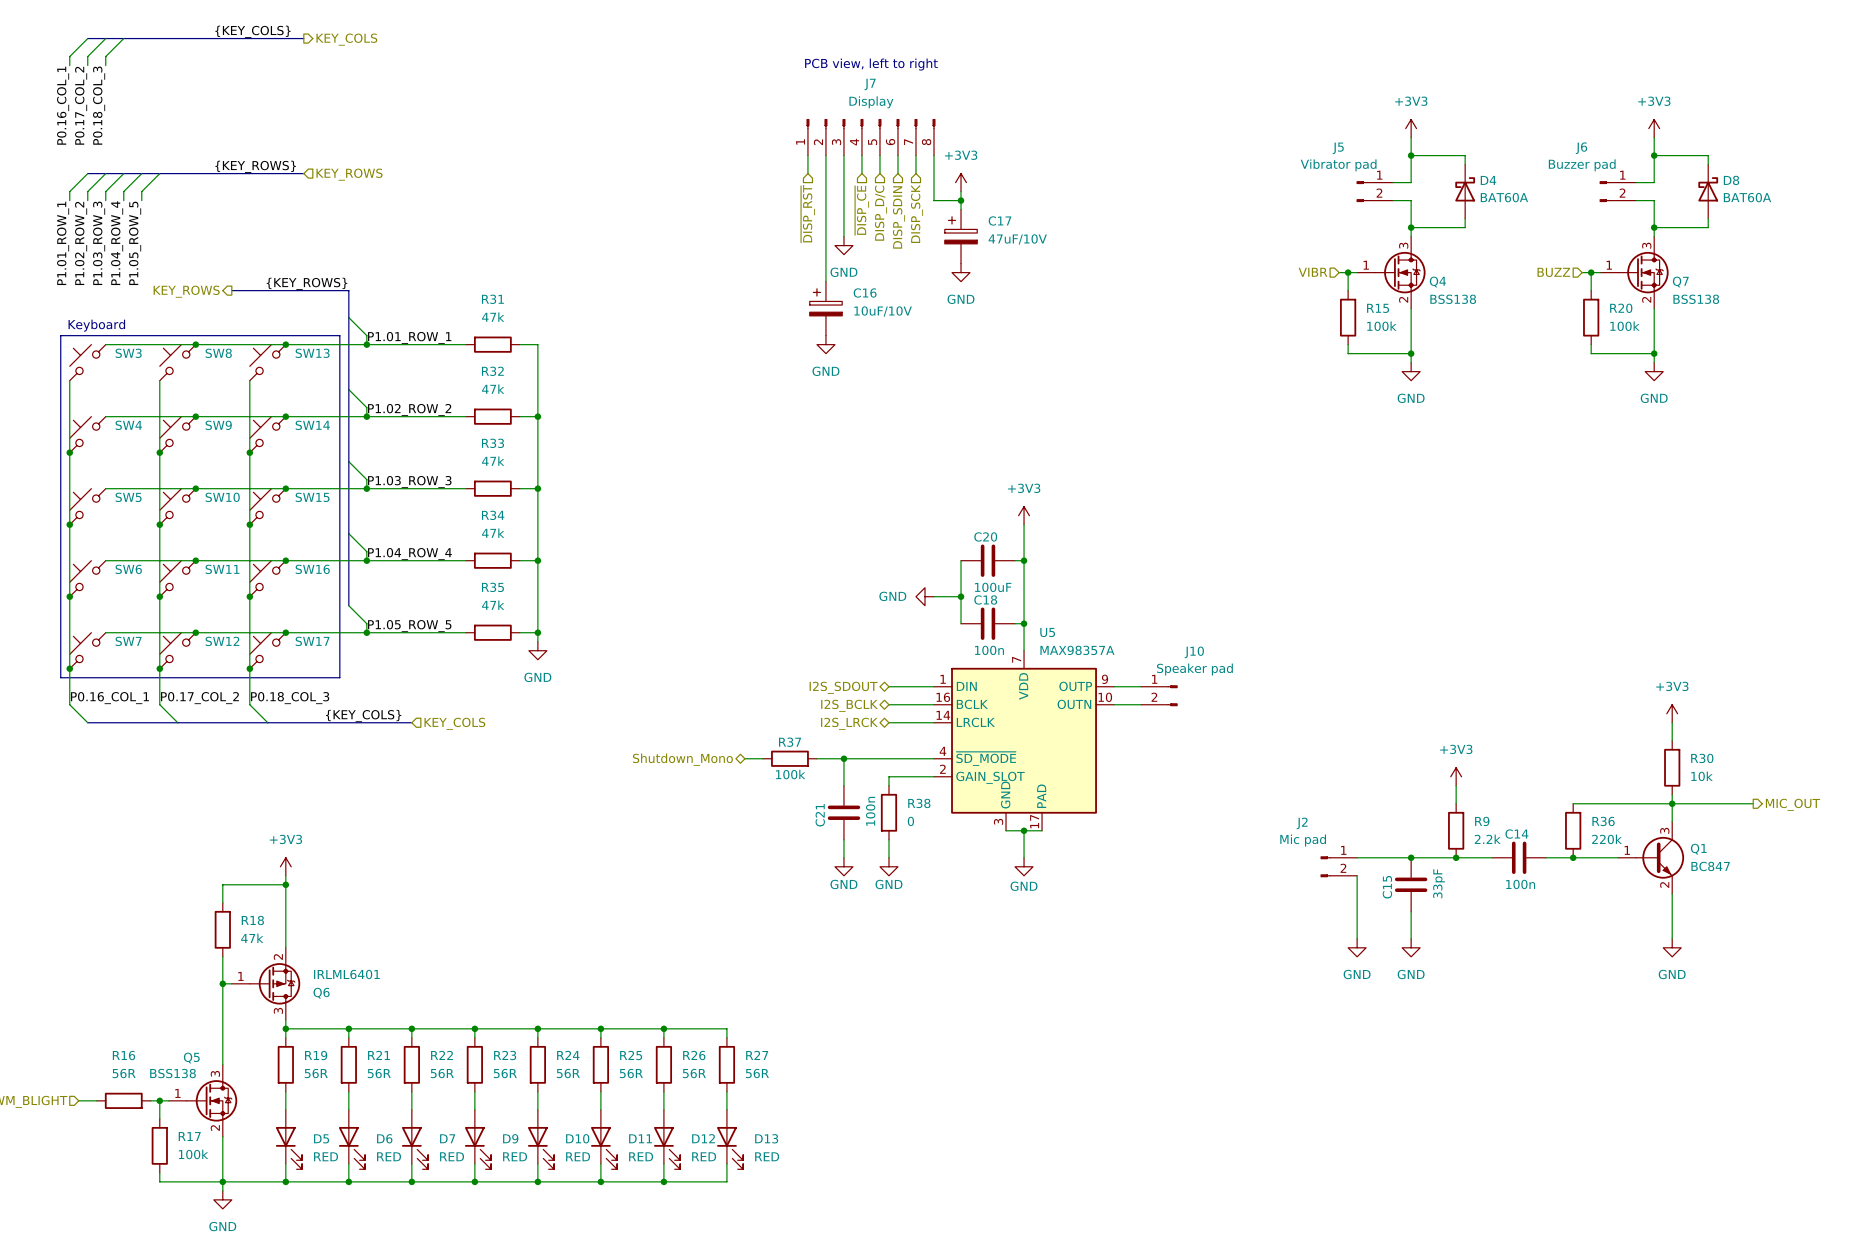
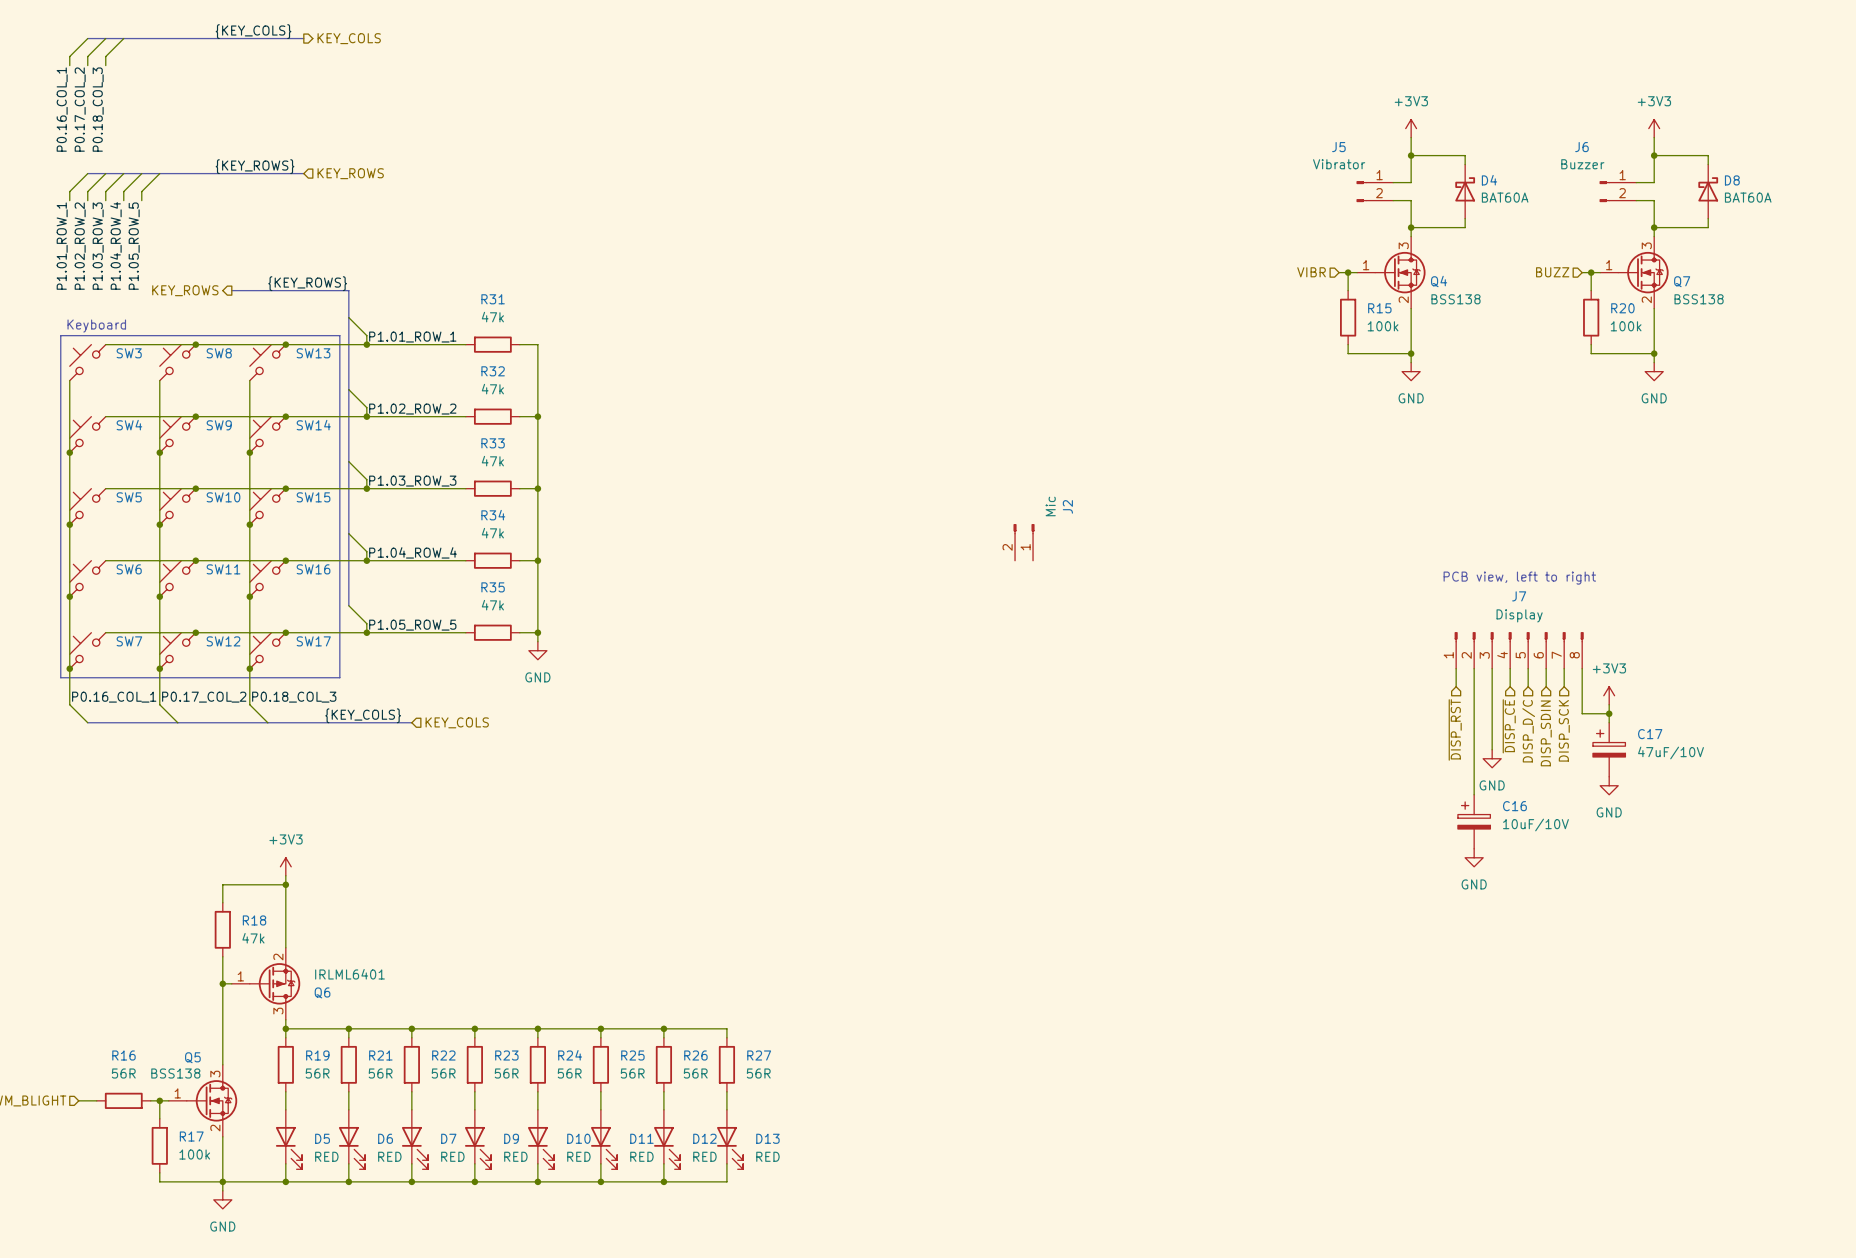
text: PCB view, left to right (871, 64) -> none
J7 position: (870, 137) -> (1519, 650)
wire: (807, 155) (807, 173) -> none
wire: (825, 155) (825, 281) -> none
wire: (843, 155) (843, 236) -> none
wire: (861, 155) (861, 173) -> none
wire: (879, 155) (879, 173) -> none
wire: (897, 155) (897, 173) -> none
wire: (915, 155) (915, 173) -> none
wire: (934, 155) (934, 200) (961, 200) -> none
J5 value: Vibrator pad (1338, 165) -> Vibrator (1339, 164)
J6 value: Buzzer pad (1582, 165) -> Buzzer (1582, 164)
power symbol: +3V3 (961, 182) -> none
wire: (961, 191) (961, 209) -> none
junction: (961, 200) -> none
hierarchical label: ~{DISP_CE} (862, 210) -> none
hierarchical label: ~{DISP_RST} (808, 213) -> none
hierarchical label: DISP_D/C (881, 213) -> none
hierarchical label: DISP_SCK (917, 213) -> none
hierarchical label: DISP_SDIN (899, 217) -> none
C17 position: (961, 236) -> (1609, 749)
power symbol: GND (843, 245) -> none
power symbol: GND (961, 272) -> none
C16 position: (825, 308) -> (1474, 821)
power symbol: GND (825, 344) -> none
power symbol: +3V3 (1024, 515) -> none
wire: (1024, 524) (1024, 650) -> none
wire: (961, 560) (961, 623) -> none
C20: 100uF (988, 560) -> none
wire: (1015, 560) (1024, 560) -> none
junction: (1024, 560) -> none
text: none -> PCB view, left to right (1519, 578)
power symbol: GND (925, 596) -> none
wire: (934, 596) (961, 596) -> none
junction: (961, 596) -> none
C18: 100n (988, 623) -> none
wire: (1015, 623) (1024, 623) -> none
junction: (1024, 623) -> none
wire: none -> (1474, 668) (1474, 794)
wire: none -> (1492, 668) (1492, 749)
wire: none -> (1510, 668) (1510, 686)
wire: none -> (1528, 668) (1528, 686)
wire: none -> (1546, 668) (1546, 686)
wire: none -> (1564, 668) (1564, 686)
wire: none -> (1582, 668) (1582, 713) (1609, 713)
wire: (888, 686) (934, 686) -> none
wire: (1114, 686) (1141, 686) -> none
hierarchical label: I2S_SDOUT (843, 687) -> none
J10: Speaker pad (1159, 695) -> none
wire: (888, 704) (934, 704) -> none
wire: (1114, 704) (1141, 704) -> none
hierarchical label: I2S_BCLK (849, 705) -> none
junction: none -> (1609, 713)
power symbol position: +3V3 (1672, 713) -> +3V3 (1609, 695)
wire: (888, 722) (934, 722) -> none
wire: (1672, 722) (1672, 740) -> (1609, 704) (1609, 722)
hierarchical label: I2S_LRCK (849, 723) -> none
hierarchical label: none -> ~{DISP_CE} (1509, 726)
hierarchical label: none -> ~{DISP_RST} (1455, 729)
hierarchical label: none -> DISP_D/C (1528, 731)
hierarchical label: none -> DISP_SCK (1564, 730)
hierarchical label: none -> DISP_SDIN (1546, 733)
U5: MAX98357A (1024, 740) -> none
wire: (744, 758) (762, 758) -> none
R37: 100k (789, 758) -> none
wire: (816, 758) (934, 758) -> none
wire: (843, 758) (843, 785) -> none
junction: (843, 758) -> none
power symbol: none -> GND (1492, 758)
hierarchical label: Shutdown_Mono (682, 759) -> none
R30: 10k (1672, 767) -> none
wire: (934, 776) (888, 776) (888, 785) -> none
power symbol: +3V3 (1456, 776) -> none
wire: (1456, 785) (1456, 803) -> (1456, 668) (1456, 686)
power symbol: none -> GND (1609, 785)
wire: (1672, 794) (1672, 821) -> none
wire: (1573, 803) (1753, 803) -> none
junction: (1672, 803) -> none
hierarchical label: MIC_OUT (1792, 804) -> none
C21: 100n (843, 812) -> none
R38: 0 (888, 812) -> none
wire: (1006, 830) (1042, 830) -> none
wire: (1024, 830) (1024, 857) -> none
junction: (1024, 830) -> none
R9: 2.2k (1456, 830) -> none
R36: 220k (1573, 830) -> none
wire: (843, 839) (843, 857) -> none
wire: (888, 839) (888, 857) -> none
J2 value: Mic pad (1303, 840) -> Mic (1050, 506)
wire: (1357, 857) (1492, 857) -> none
junction: (1411, 857) -> none
junction: (1456, 857) -> none
power symbol: none -> GND (1474, 857)
C14: 100n (1519, 857) -> none
wire: (1546, 857) (1618, 857) -> none
junction: (1573, 857) -> none
Q1: BC847 (1651, 857) -> none
power symbol: GND (843, 866) -> none
power symbol: GND (888, 866) -> none
power symbol: GND (1024, 866) -> none
J2 rotation: 0° (1325, 866) -> 90° clockwise (1024, 529)
J2 position: (1338, 866) -> (1024, 542)
wire: (1357, 875) (1357, 938) -> none
C15: 33pF (1411, 884) -> none
wire: (1672, 893) (1672, 938) -> none
wire: (1411, 911) (1411, 938) -> none
power symbol: GND (1357, 947) -> none
power symbol: GND (1411, 947) -> none
power symbol: GND (1672, 947) -> none

